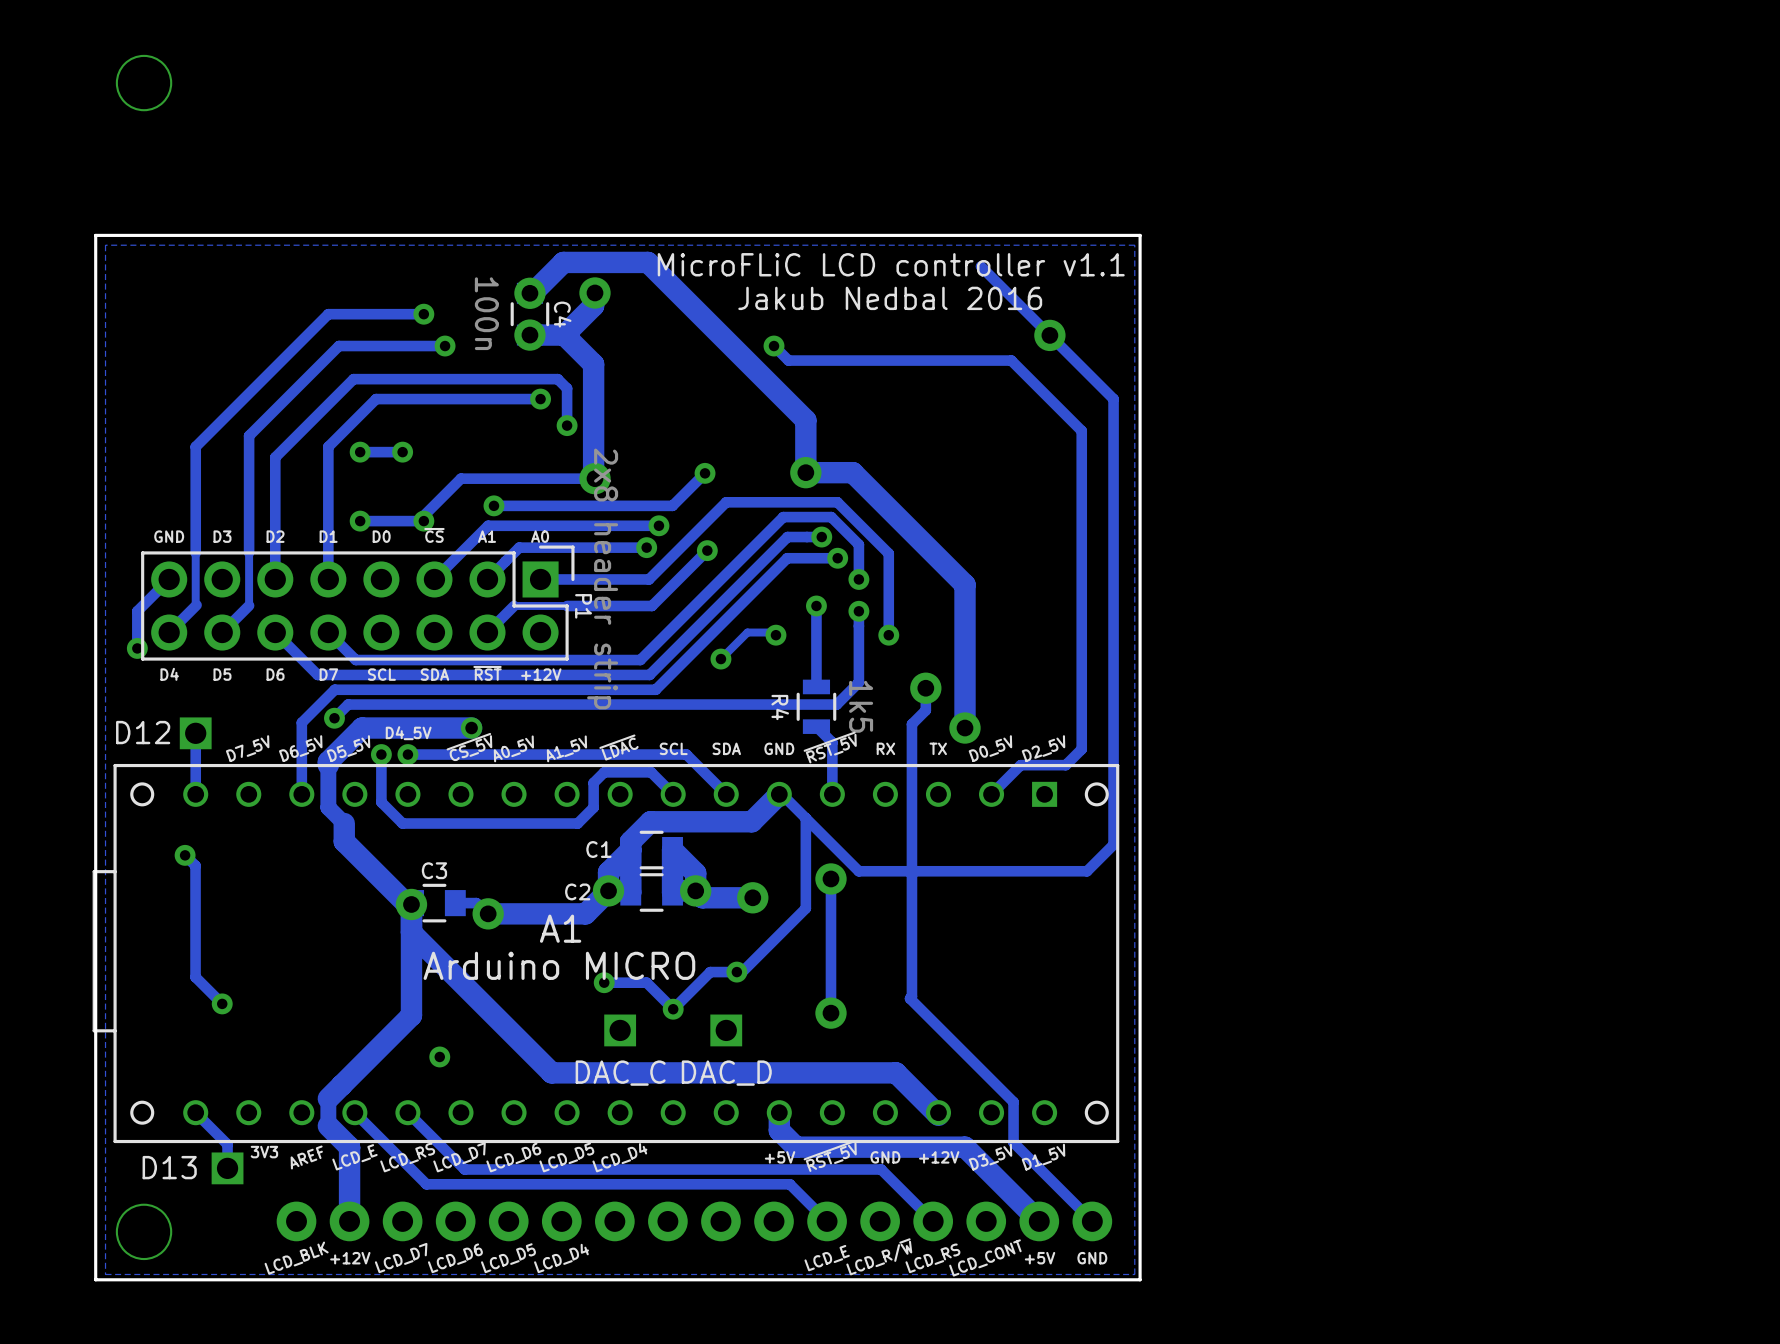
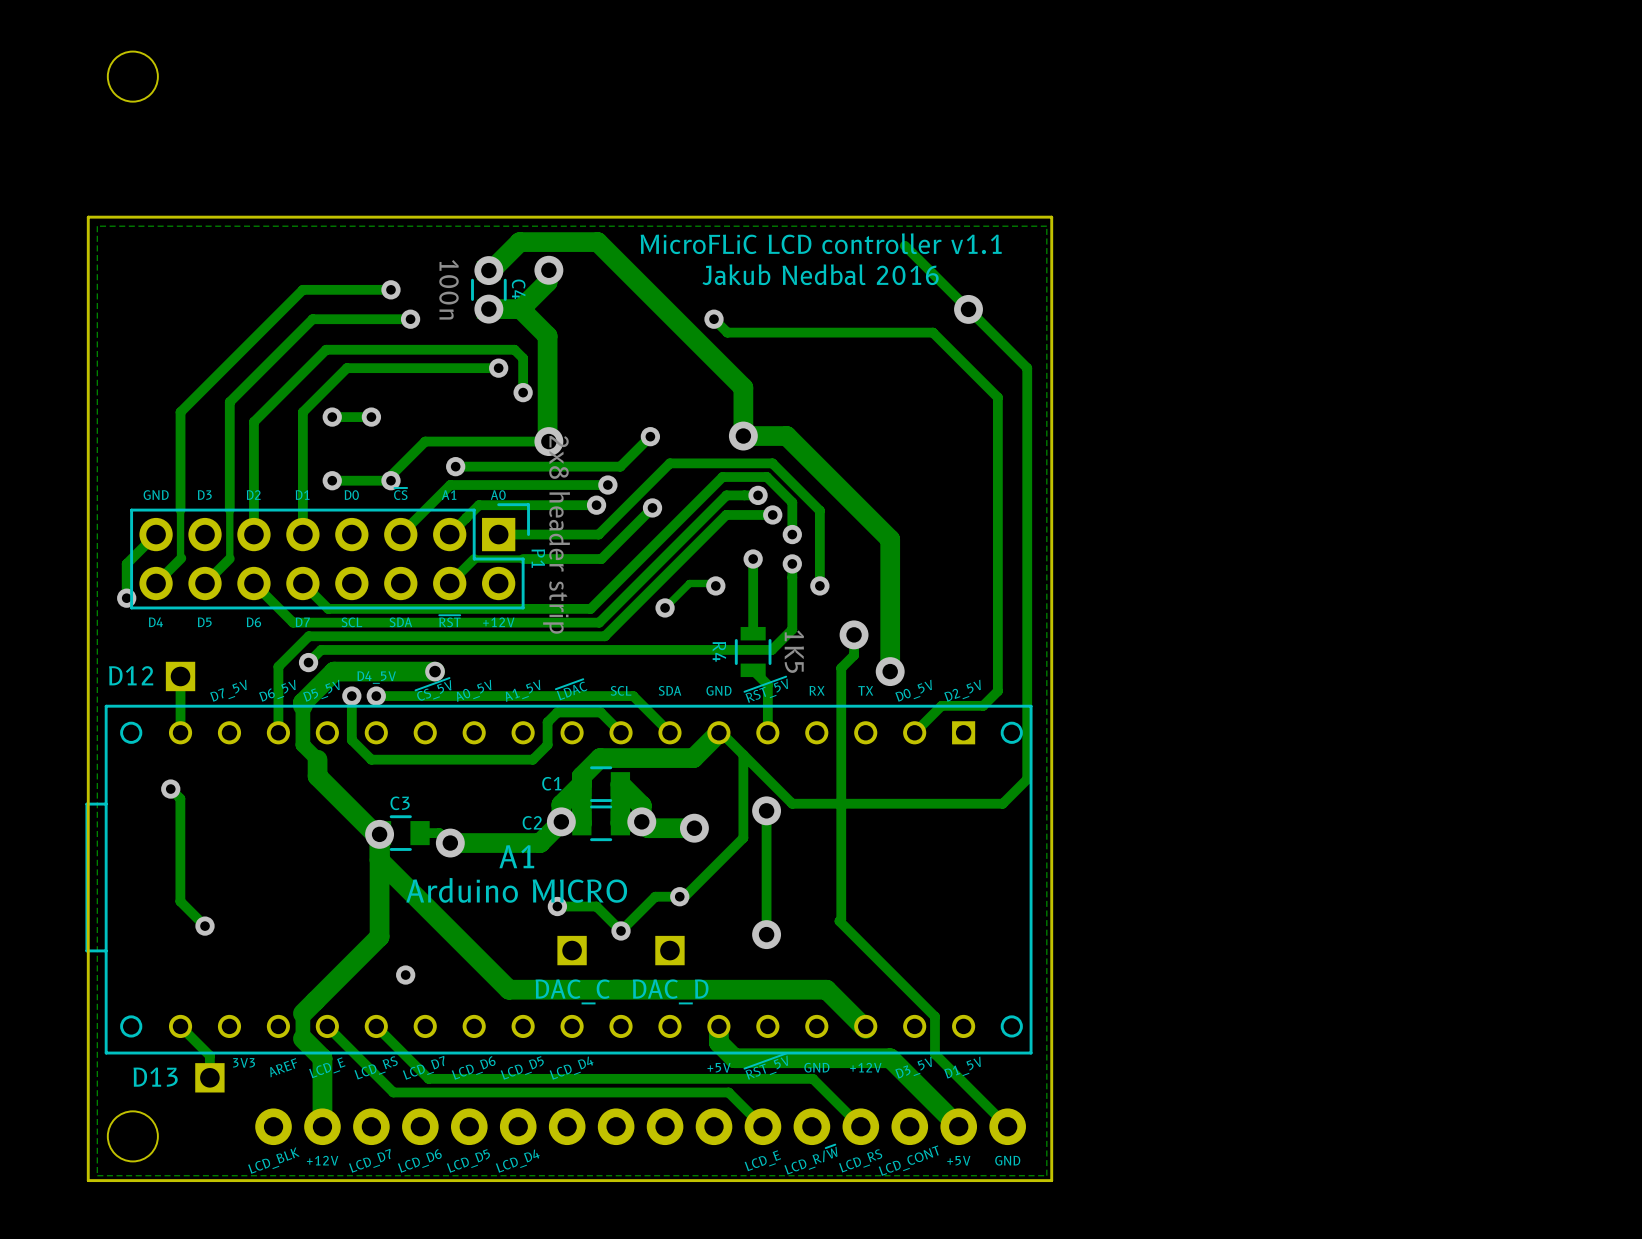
R4 value: 1k5 (861, 706) -> 1K5 (794, 651)

